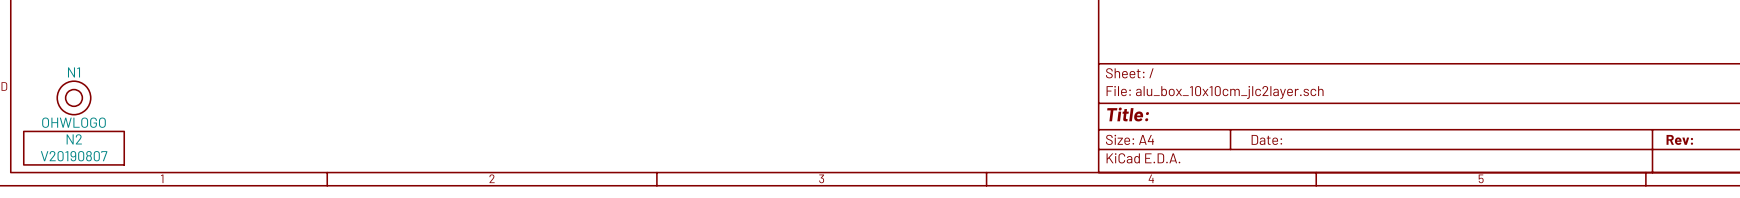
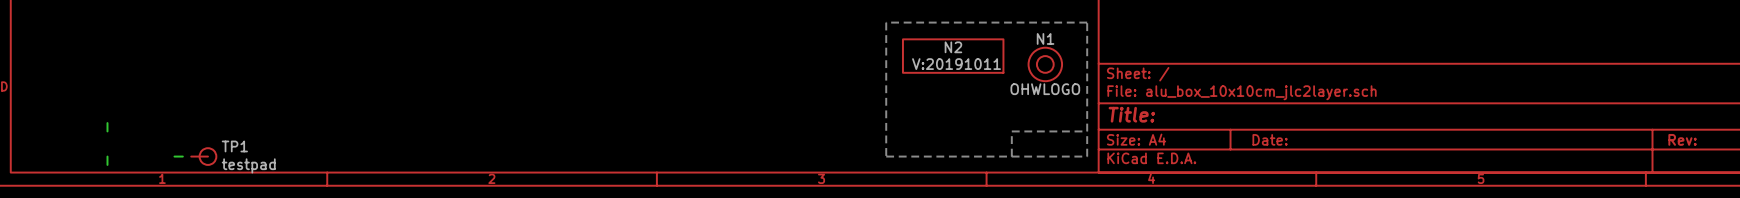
line: none -> (886, 22) (1087, 22) (1087, 156) (886, 156) (886, 22)
N1 position: (73, 97) -> (1045, 64)
line: none -> (1087, 131) (1011, 131) (1011, 156)
N2 position: (73, 148) -> (953, 56)
N2 value: V20190807 (74, 156) -> V:20191011 (956, 64)
wire: none -> (107, 156) (107, 164)
wire: none -> (174, 156) (182, 156)
TP1: none -> testpad (203, 156)

